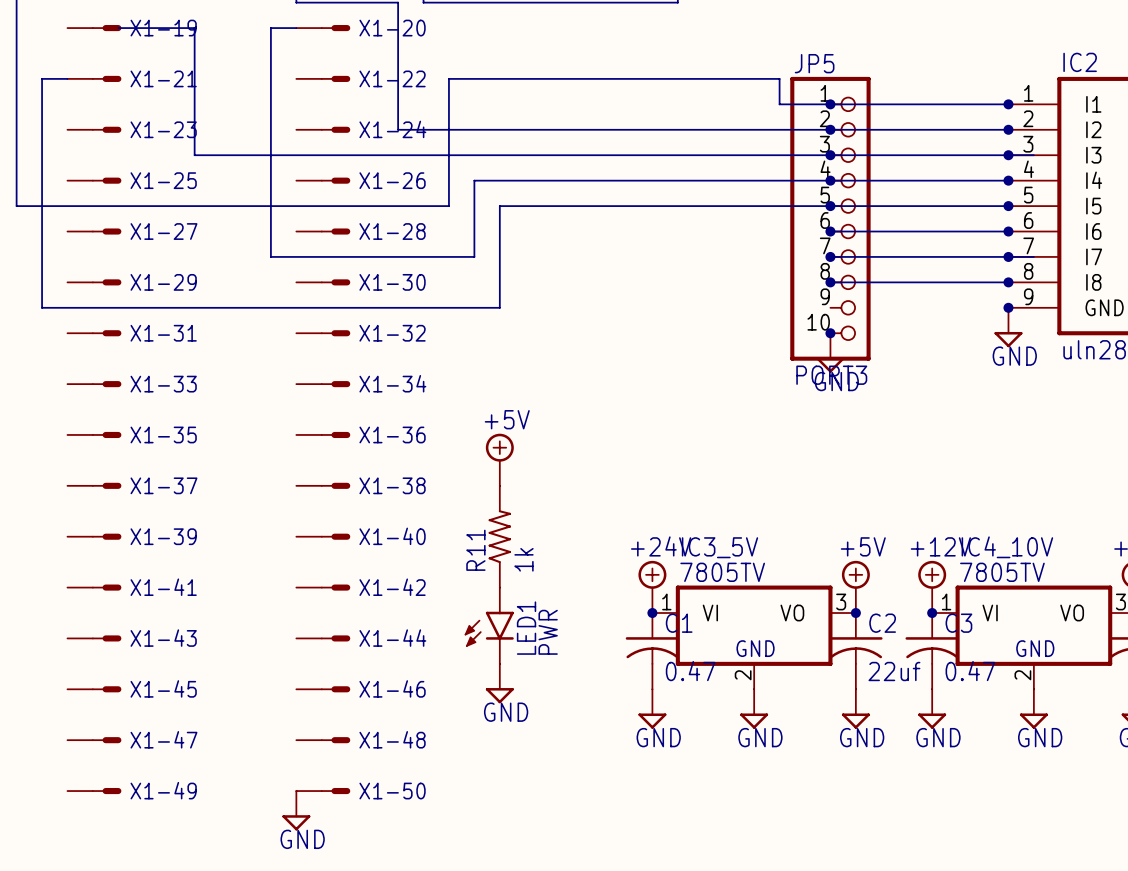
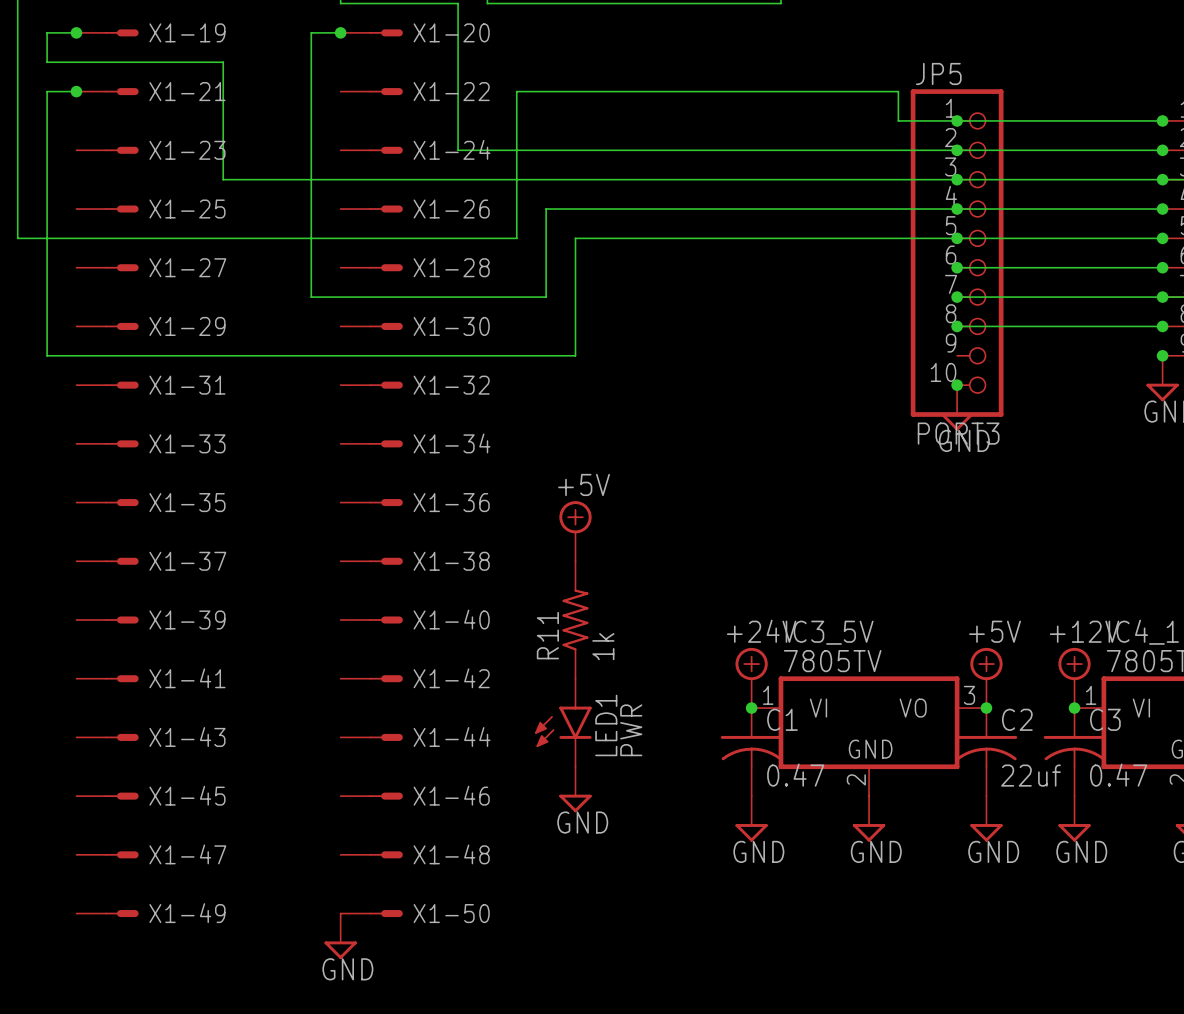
junction: none -> (76, 32)
wire: (118, 28) (194, 28) (194, 53) -> (76, 32) (47, 32) (47, 62) (223, 62)
junction: none -> (340, 32)
junction: none -> (76, 91)

